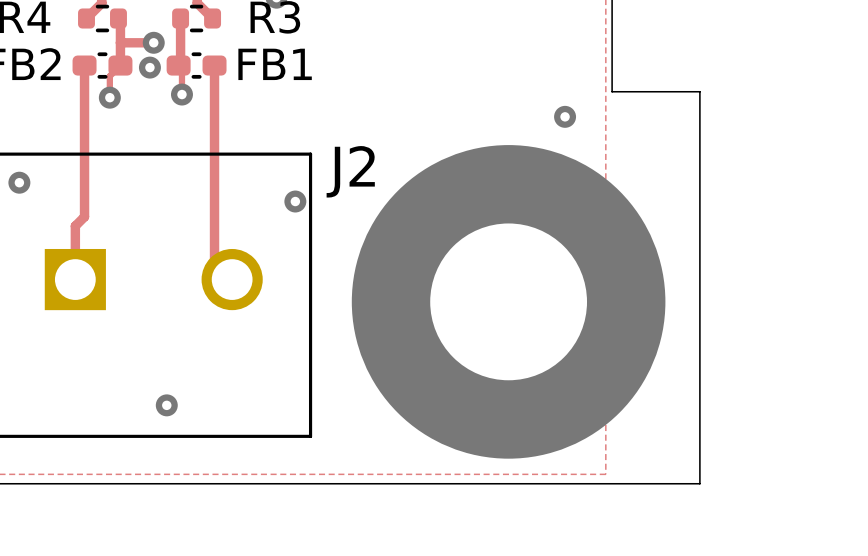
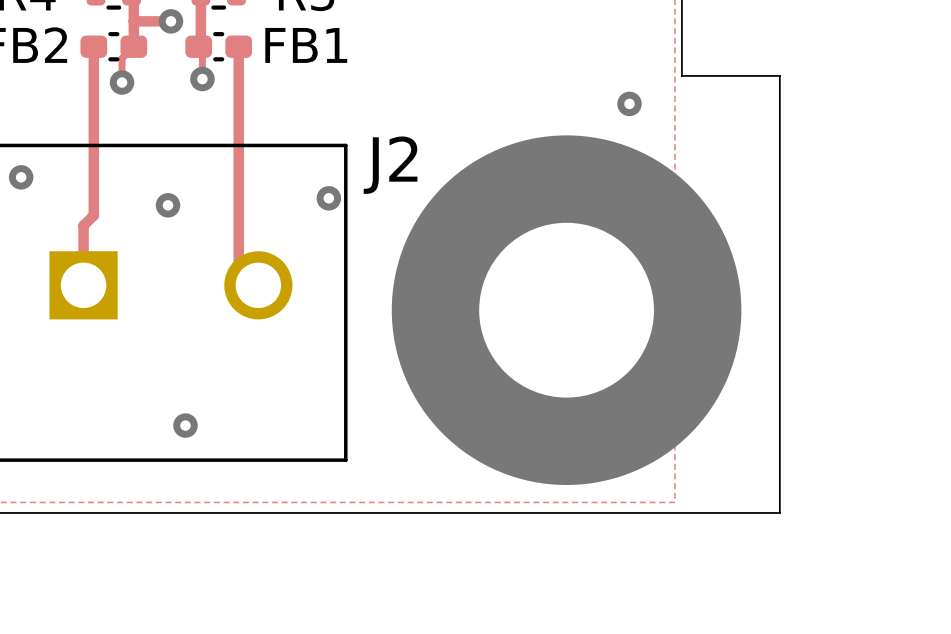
via: (149, 67) -> none
via: none -> (168, 205)

